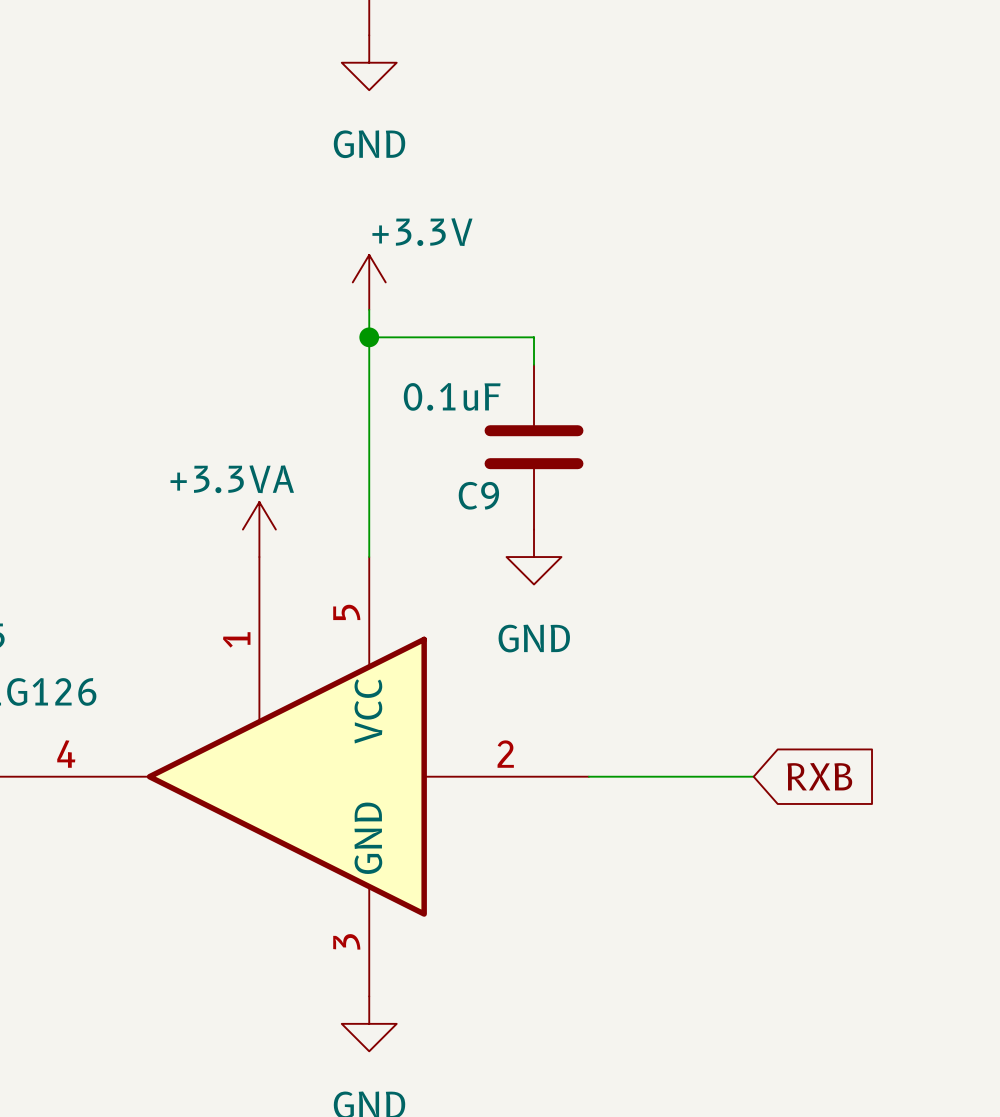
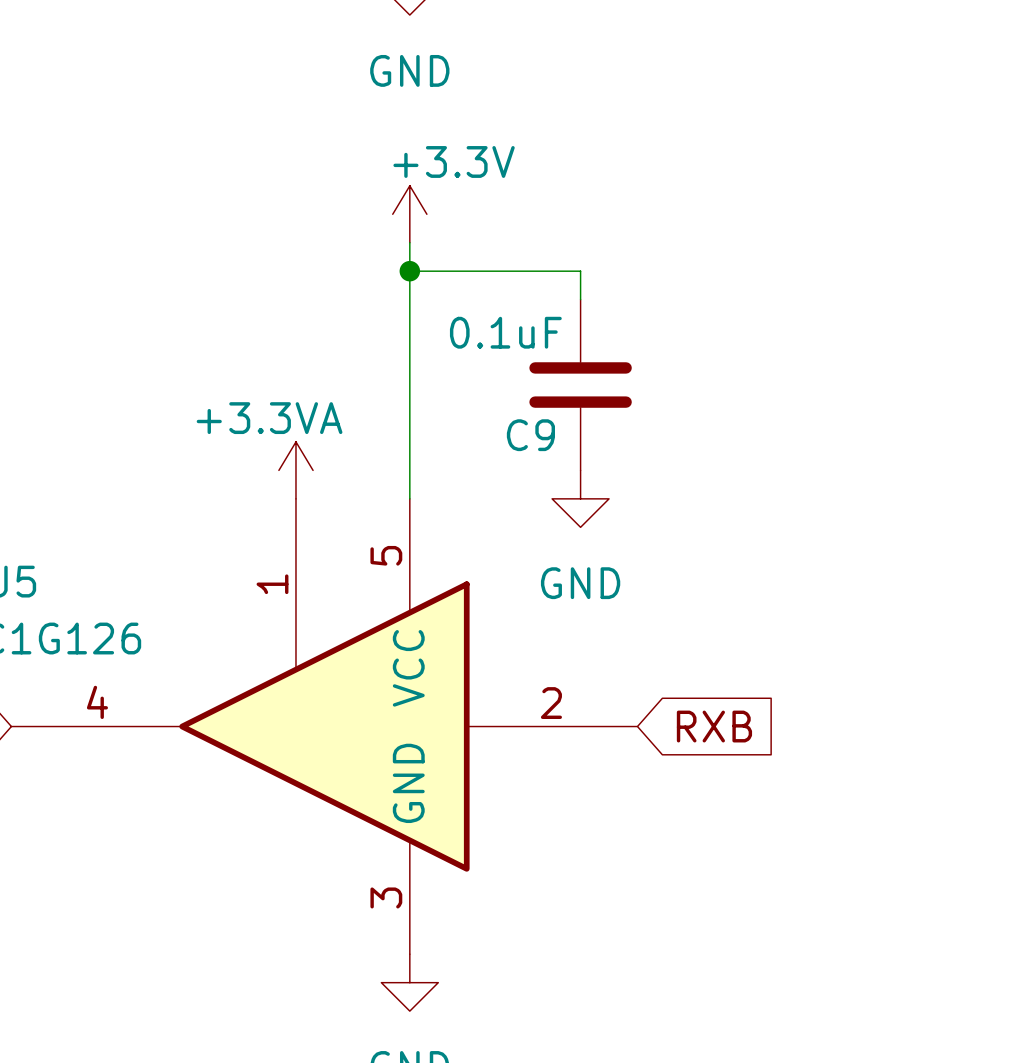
wire: (588, 776) (753, 776) -> none
global label position: RXB (819, 776) -> RXB (714, 726)

